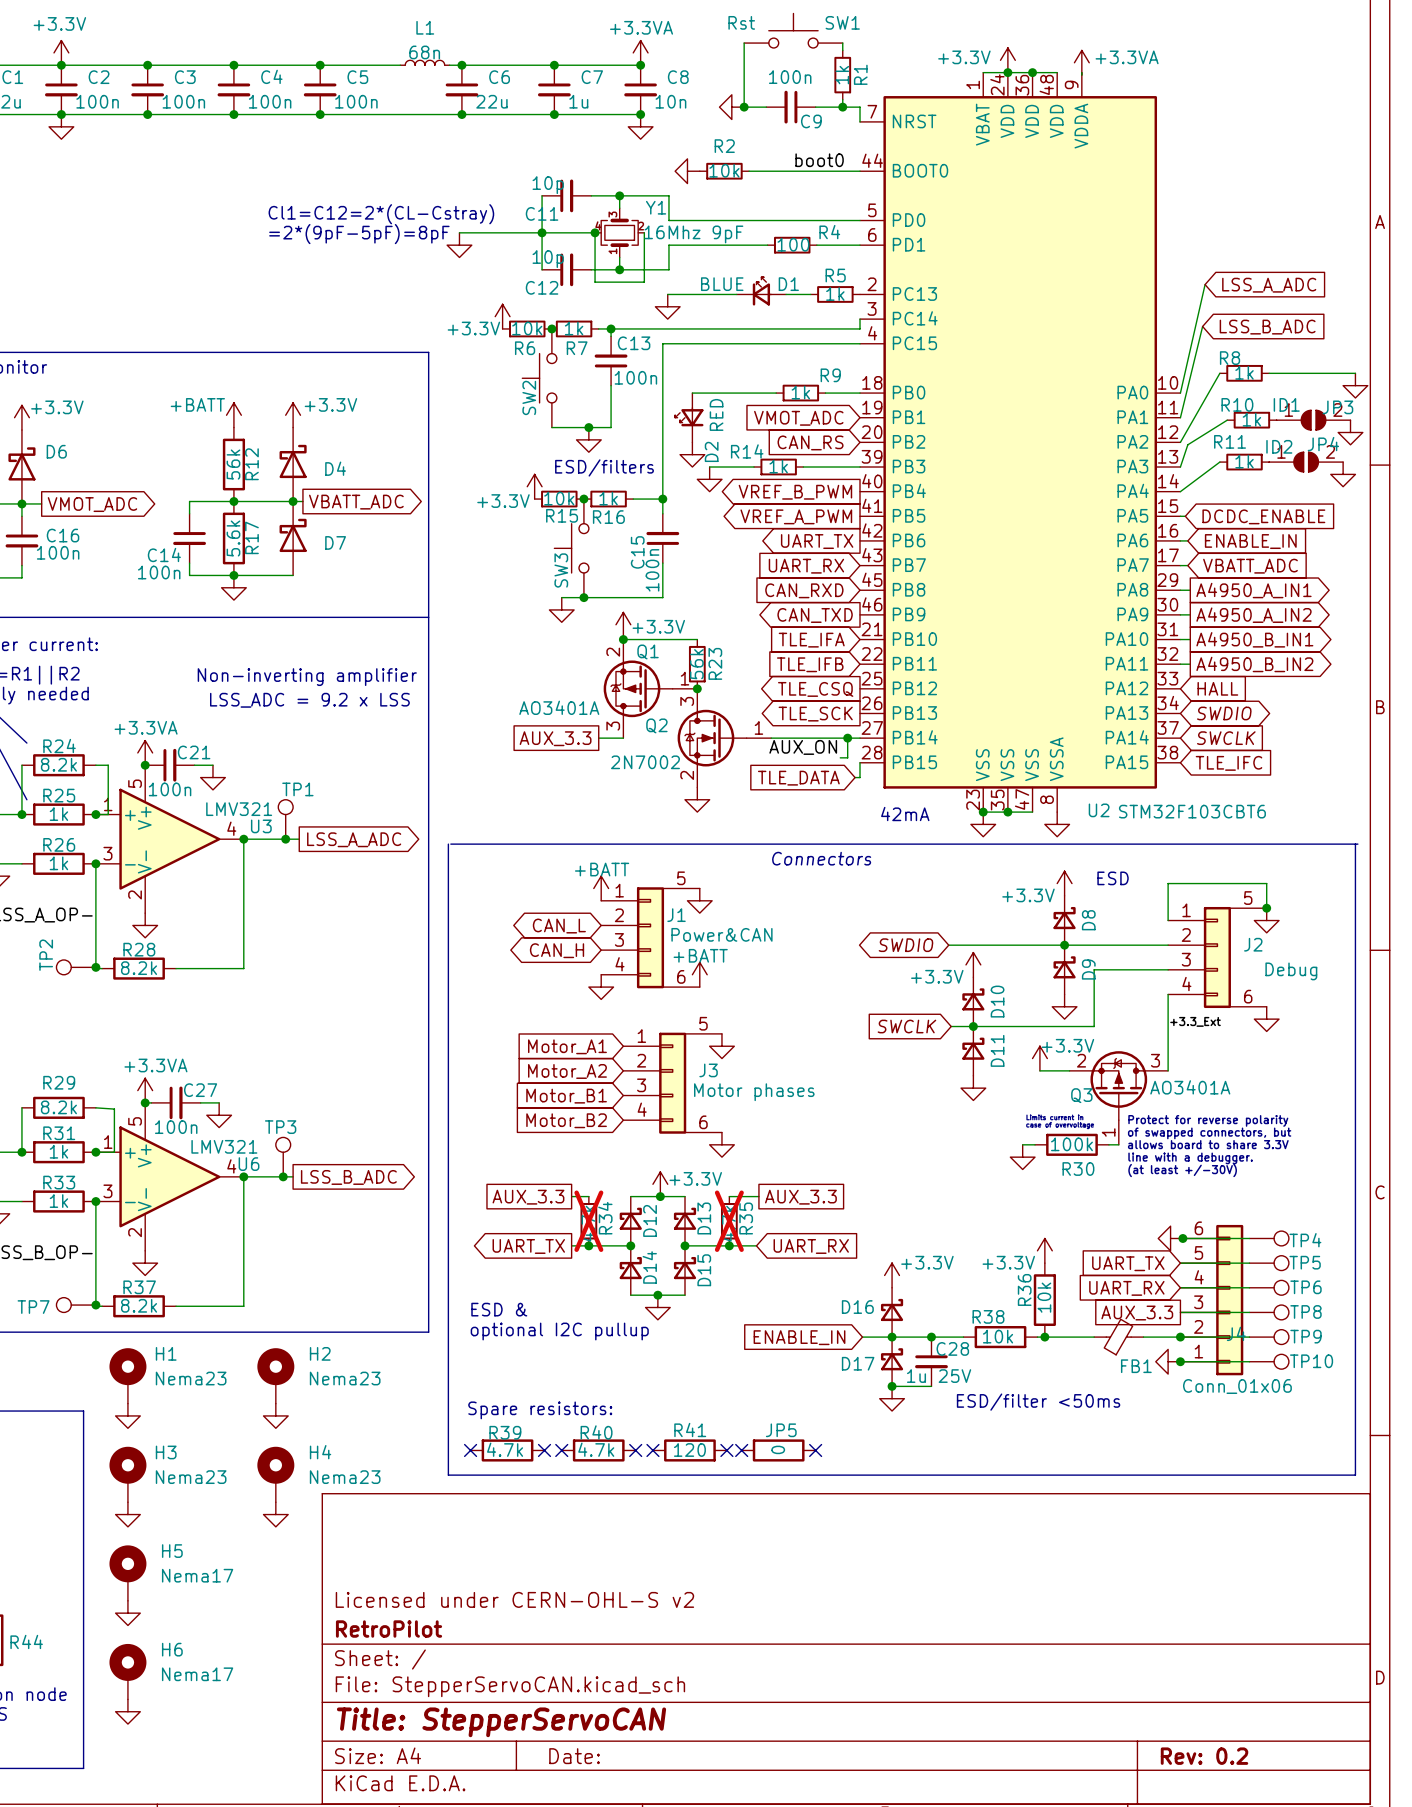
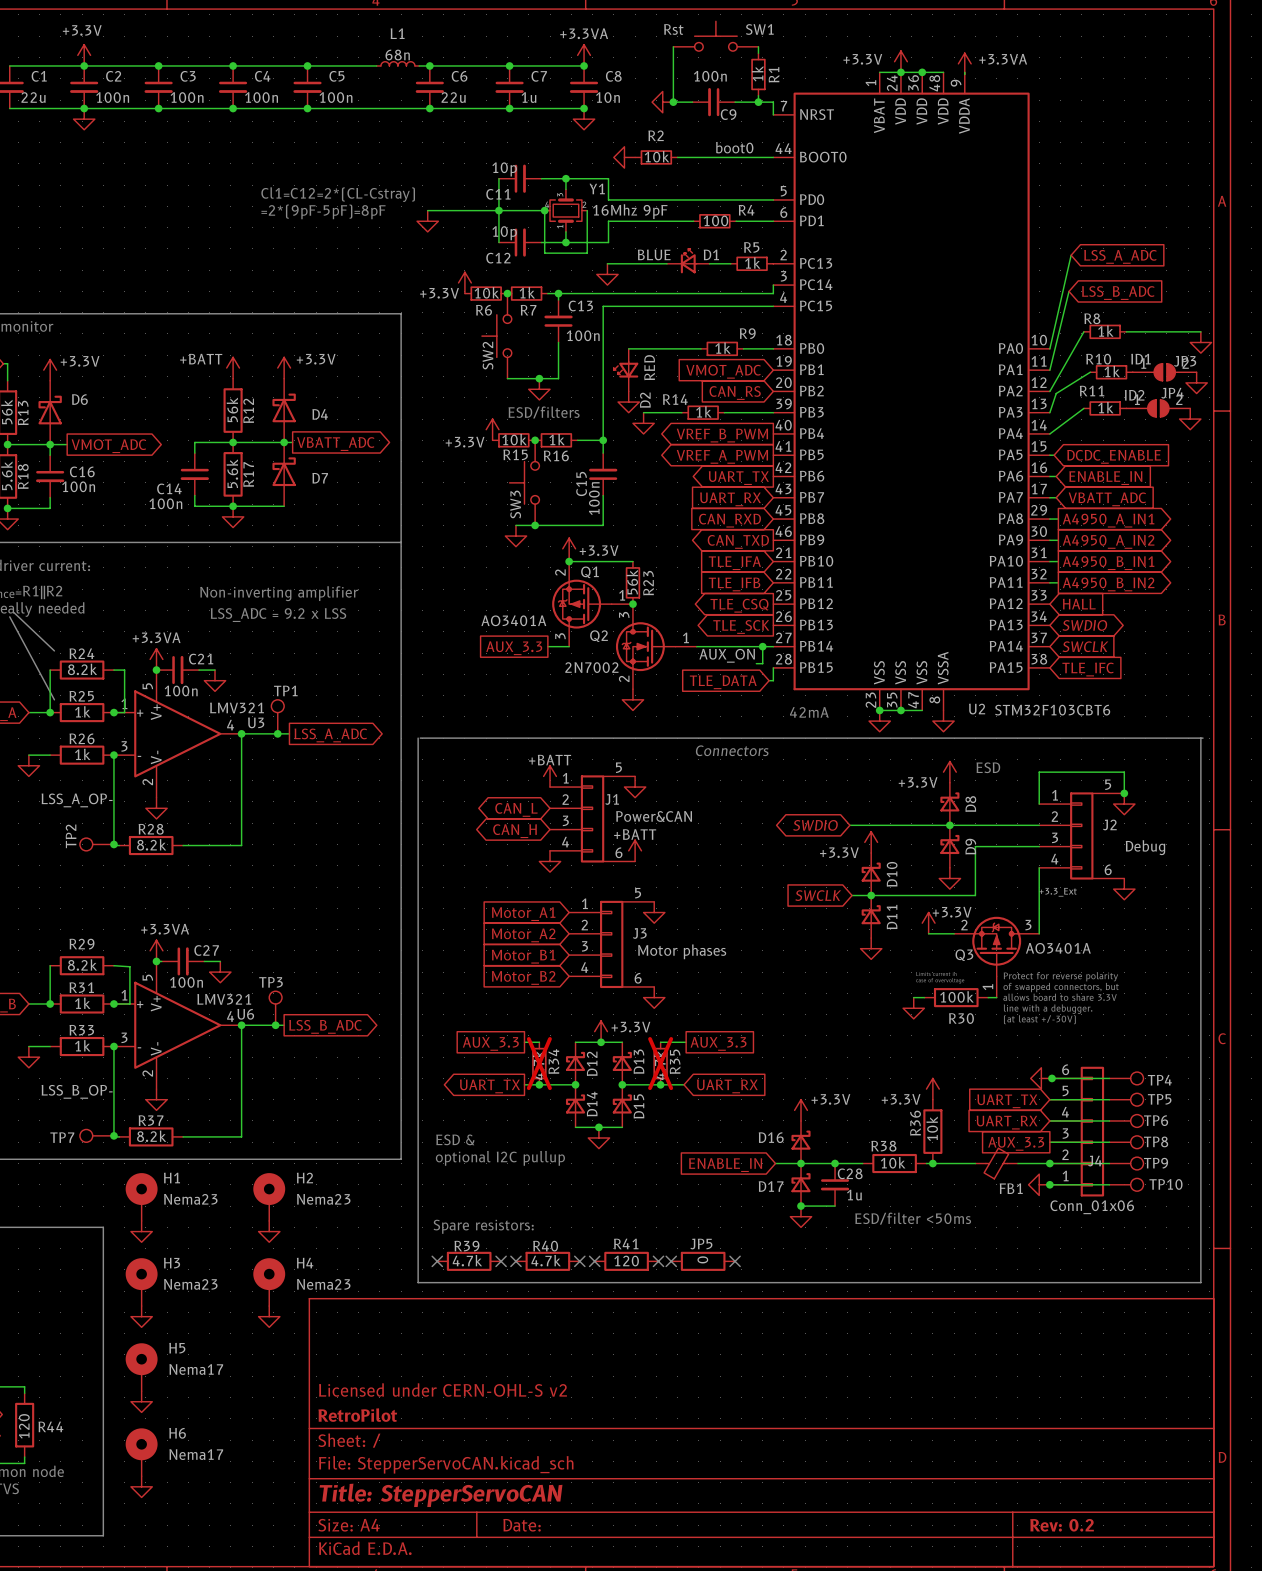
C28 value: 1u 25V (939, 1376) -> 1u (854, 1195)

